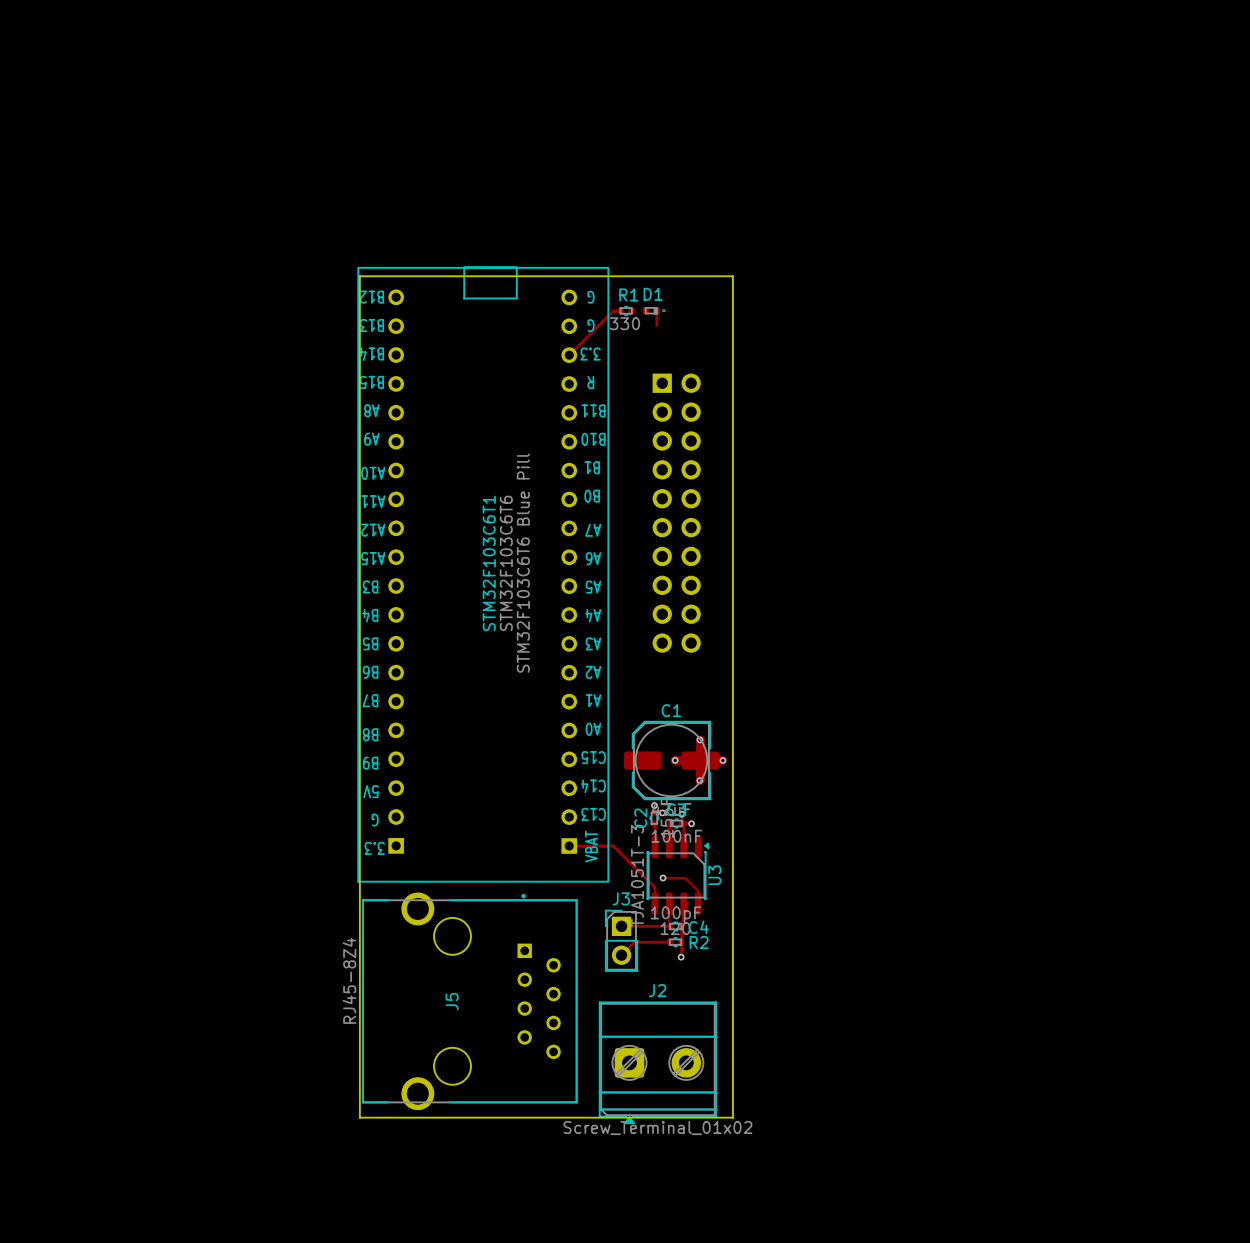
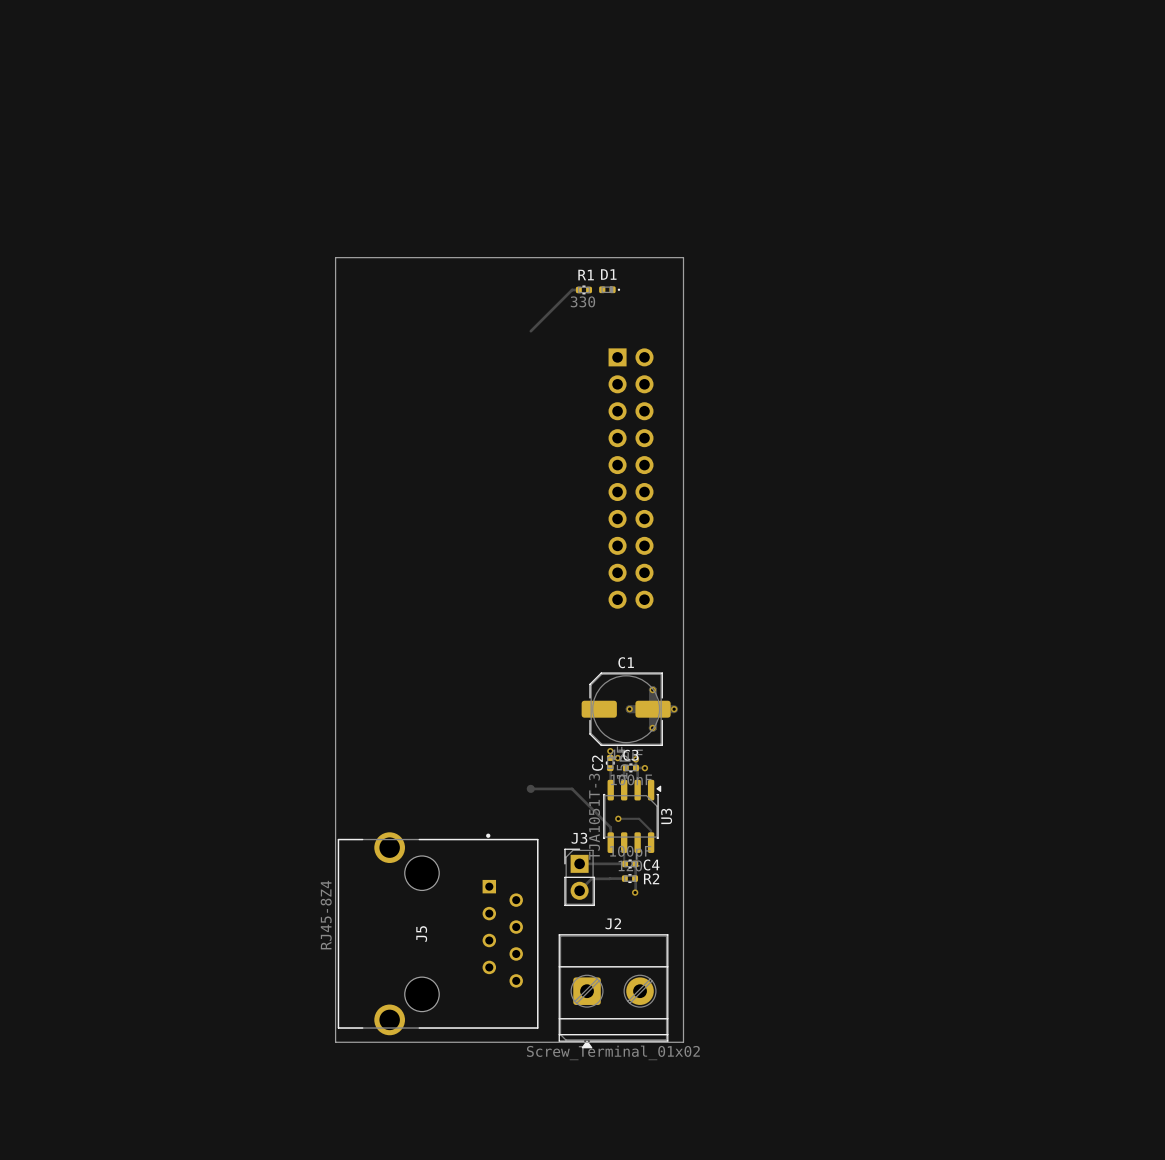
track: (656, 310) (656, 325) -> none
STM32F103C6T1: STM32F103C6T6 (483, 574) -> none

